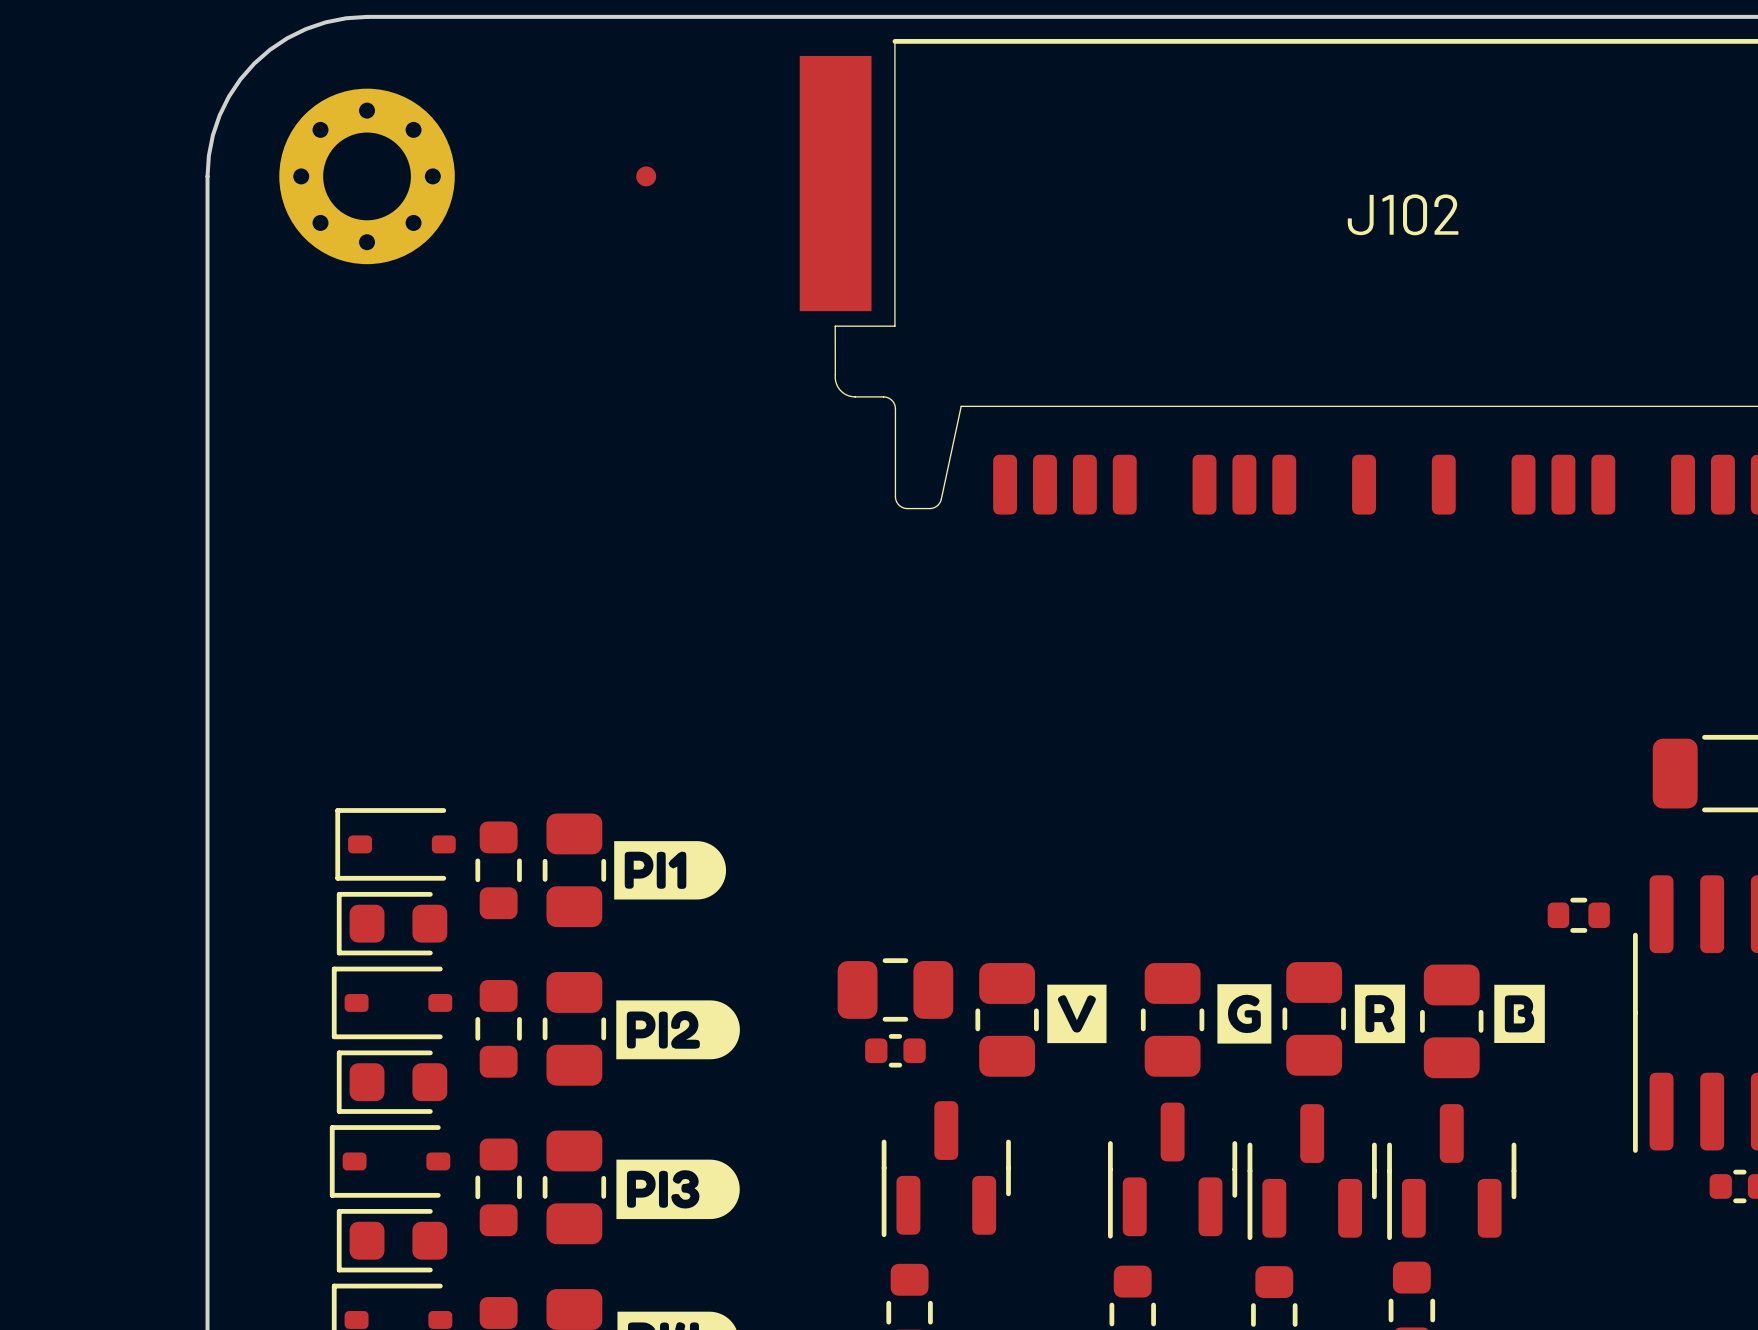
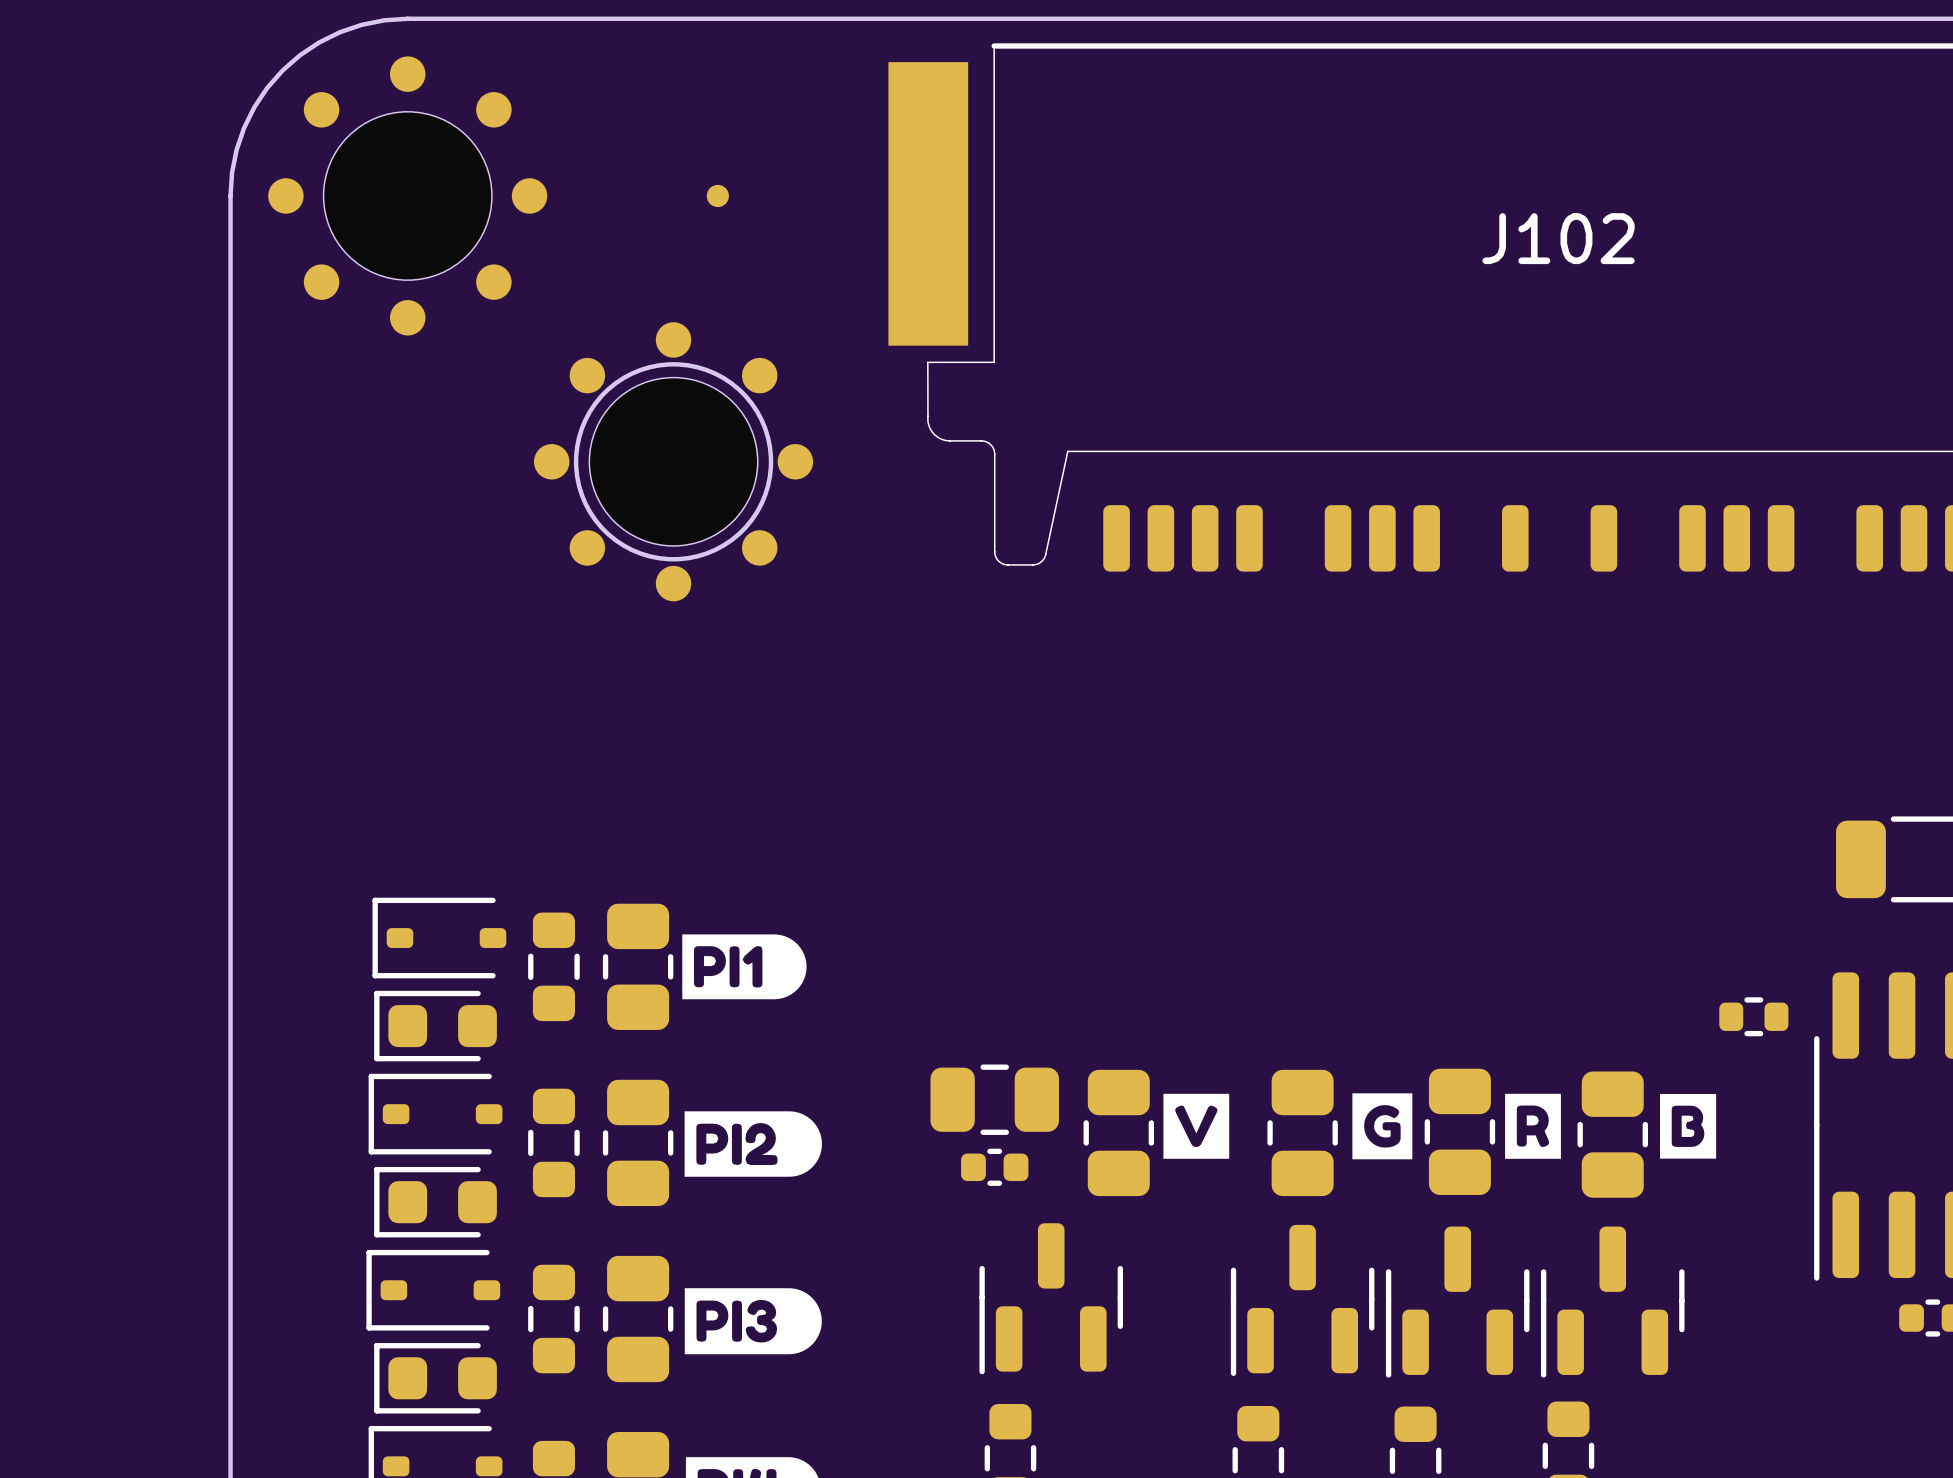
part footprint: [279, 88, 455, 265] -> [268, 56, 548, 336]
round board edge: none -> [573, 362, 774, 562]
part: none -> (673, 461)

